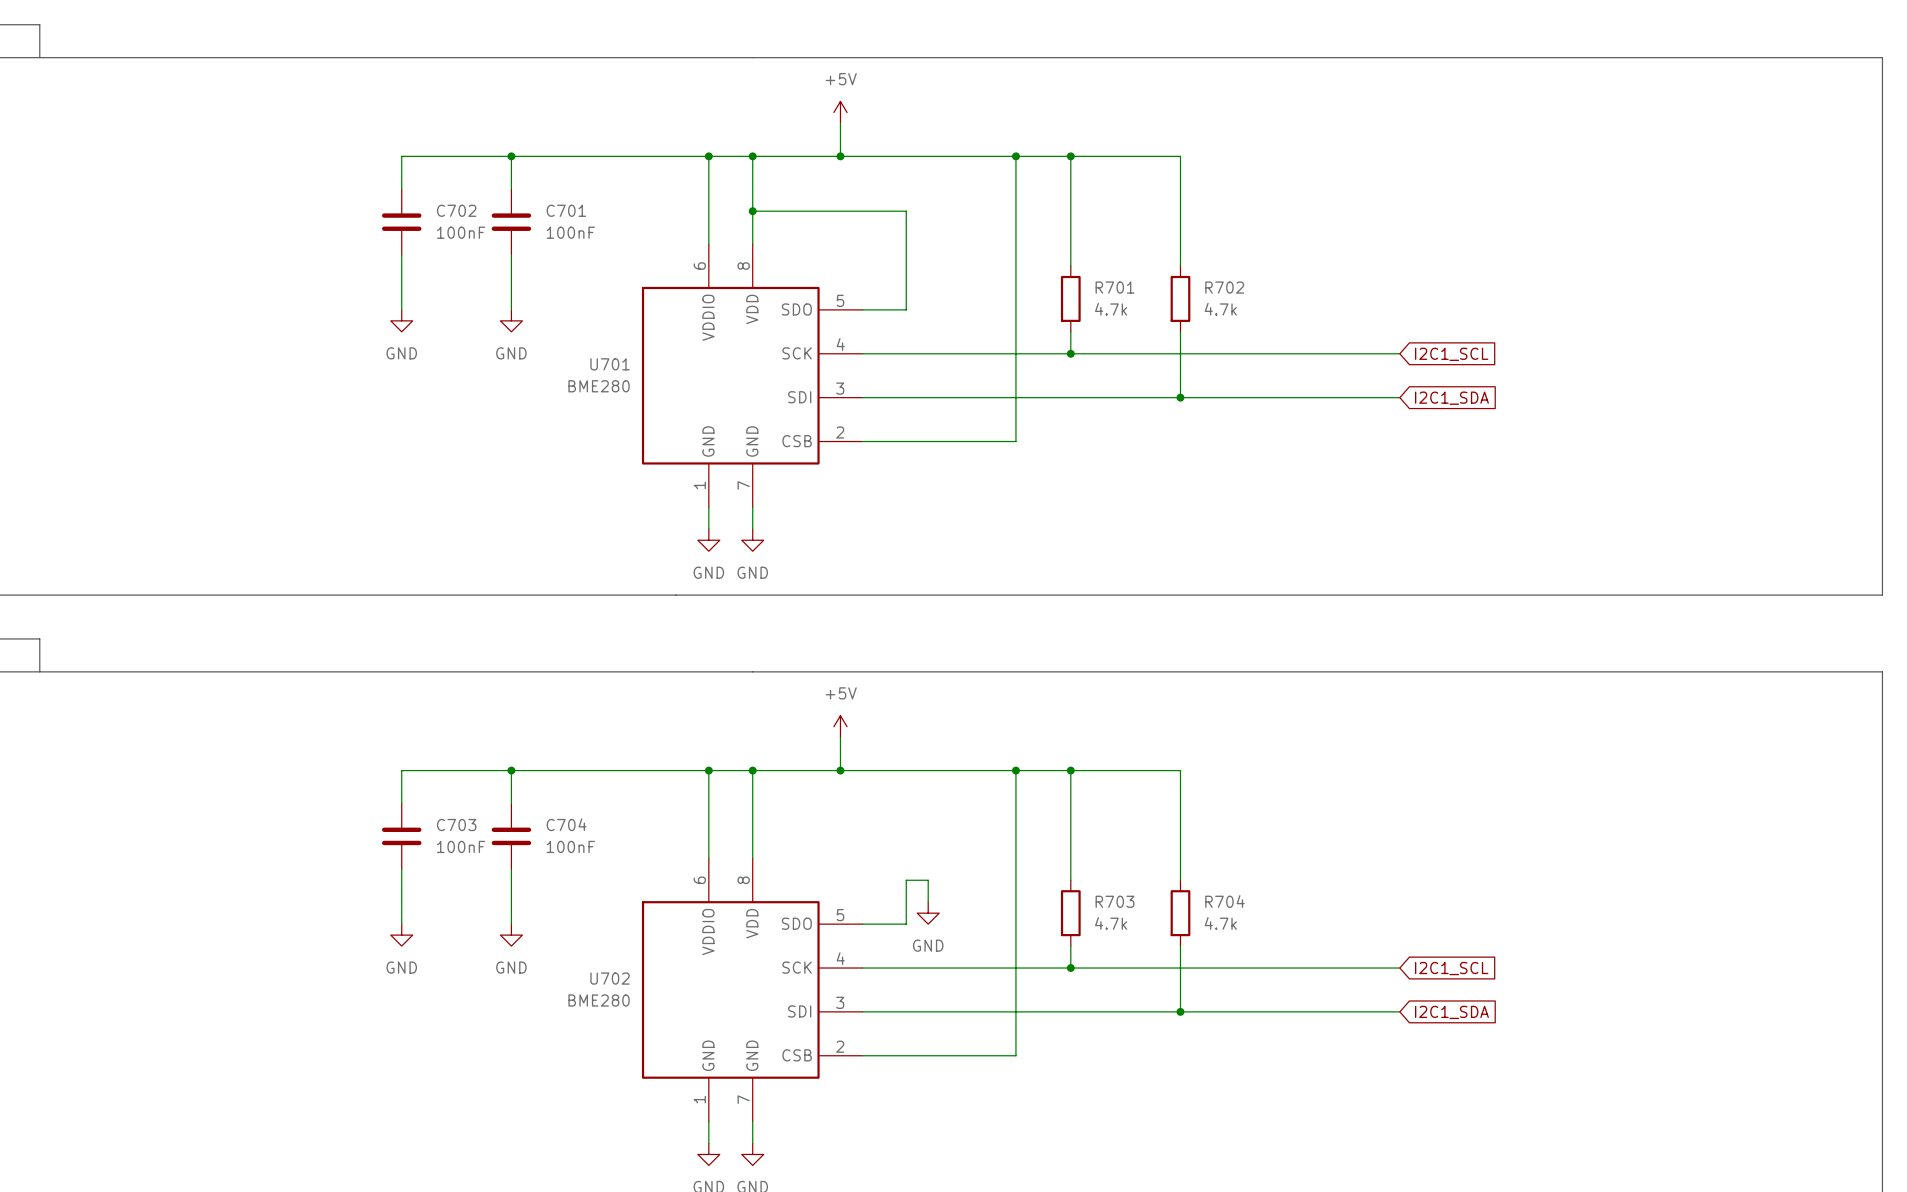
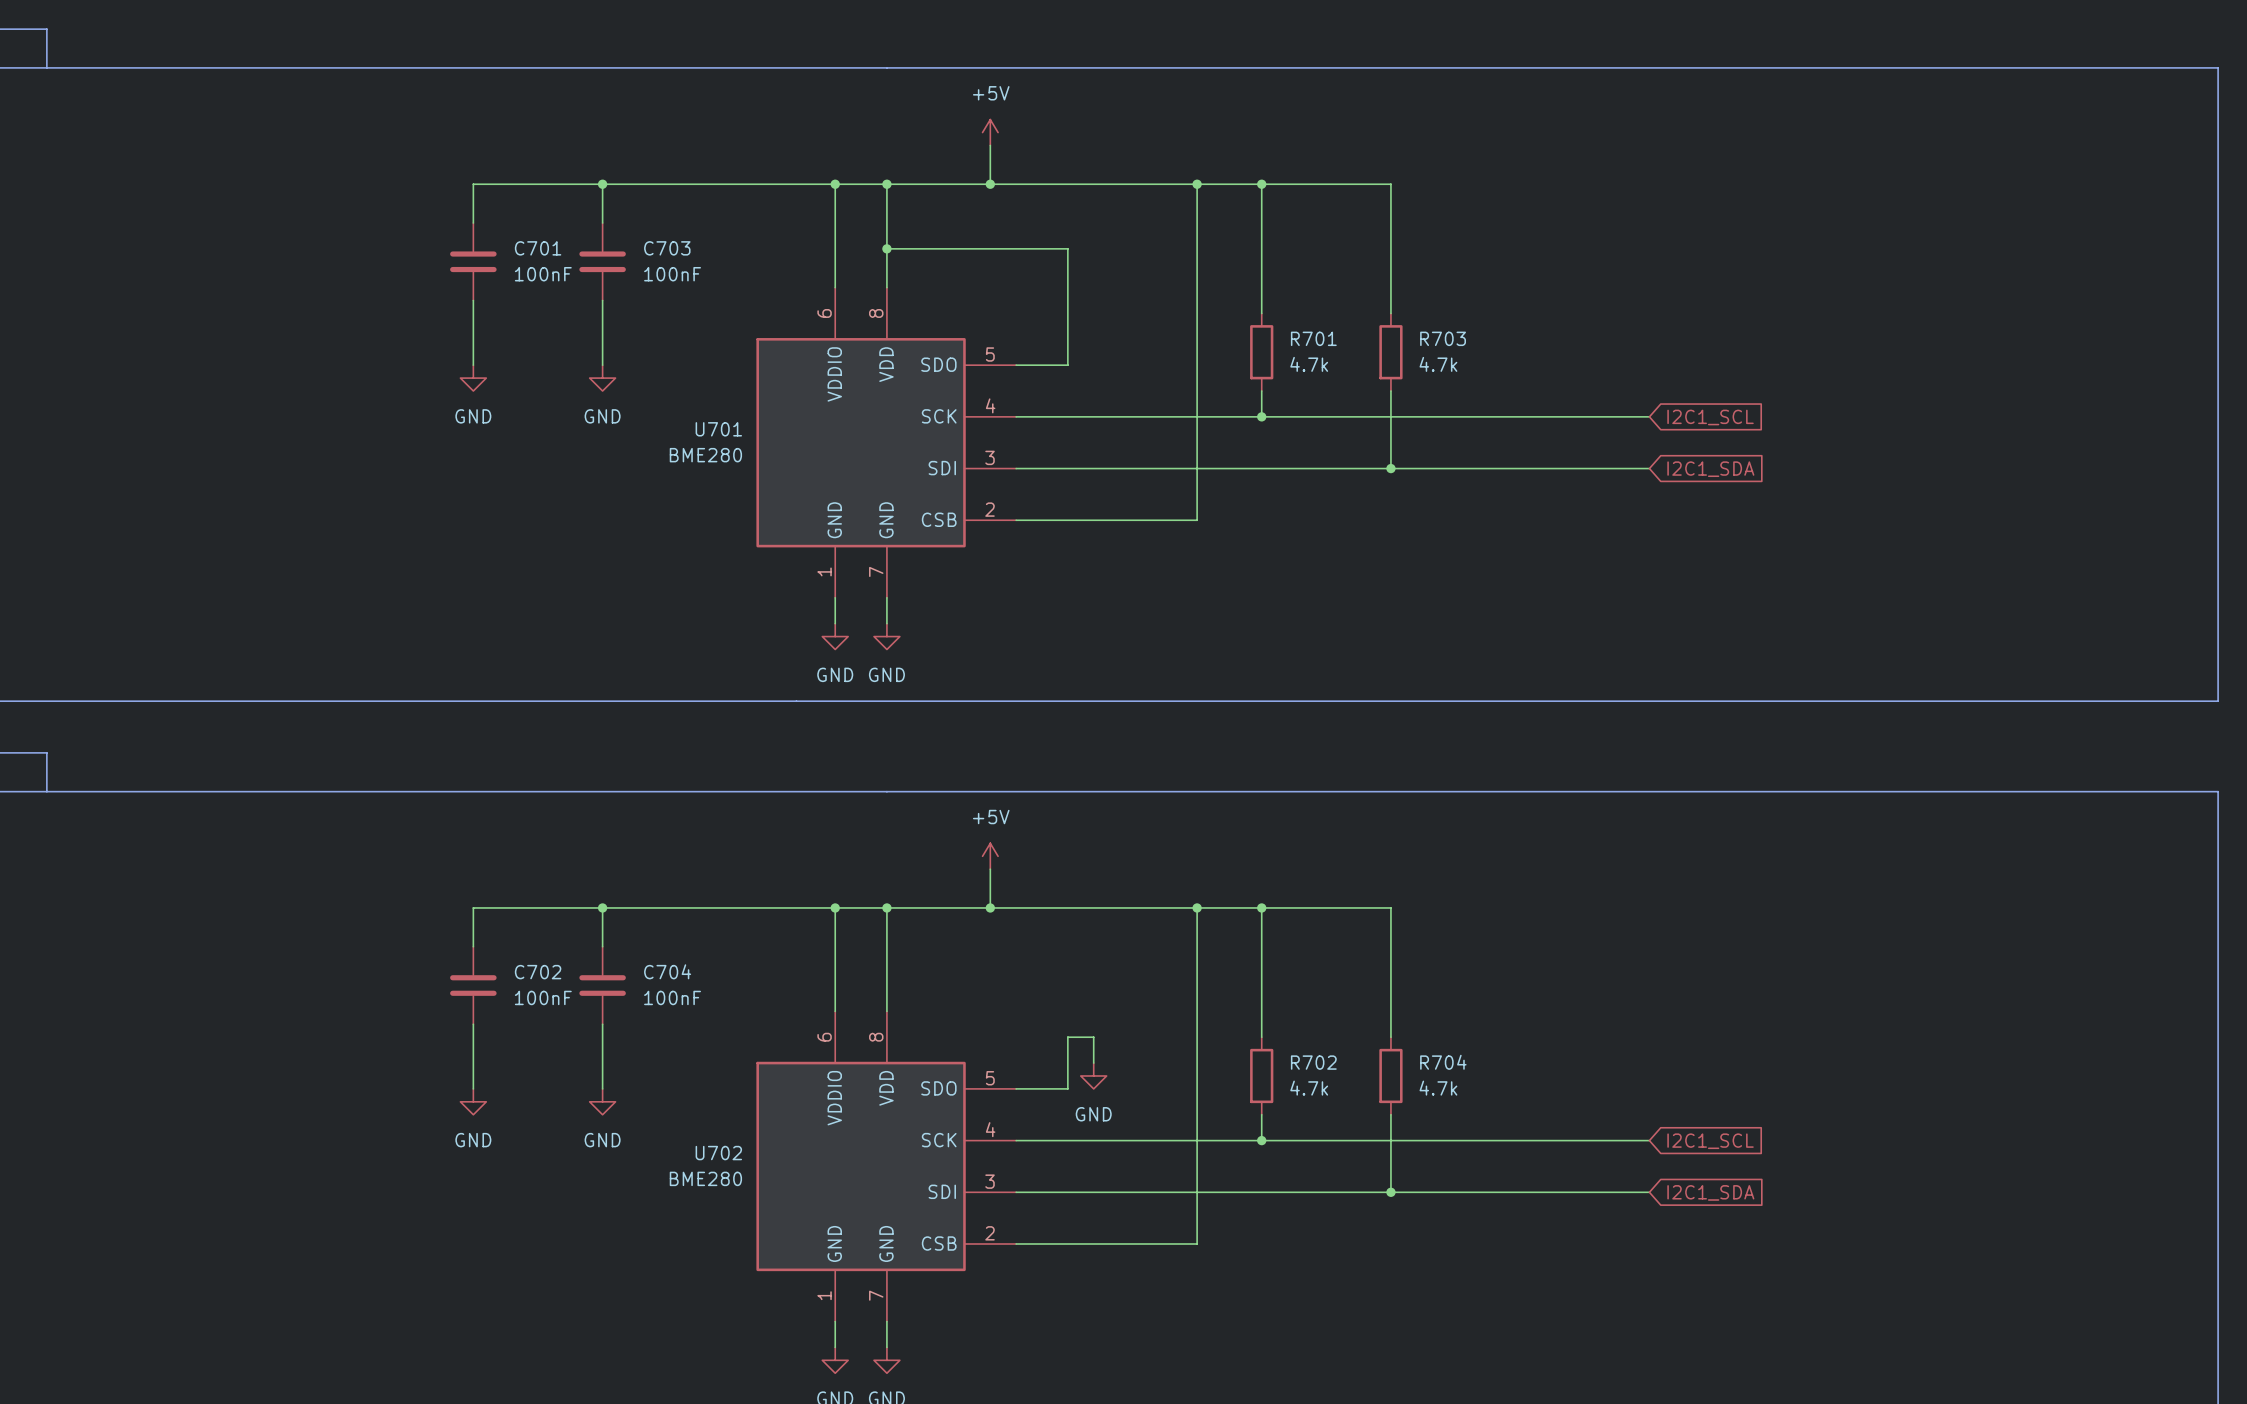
C702 name: C702 (456, 210) -> C701 (538, 248)
C701 name: C701 (566, 210) -> C703 (667, 248)
R702 name: R702 (1224, 287) -> R703 (1443, 338)
C703 name: C703 (456, 825) -> C702 (538, 972)
R703 name: R703 (1115, 901) -> R702 (1313, 1062)

